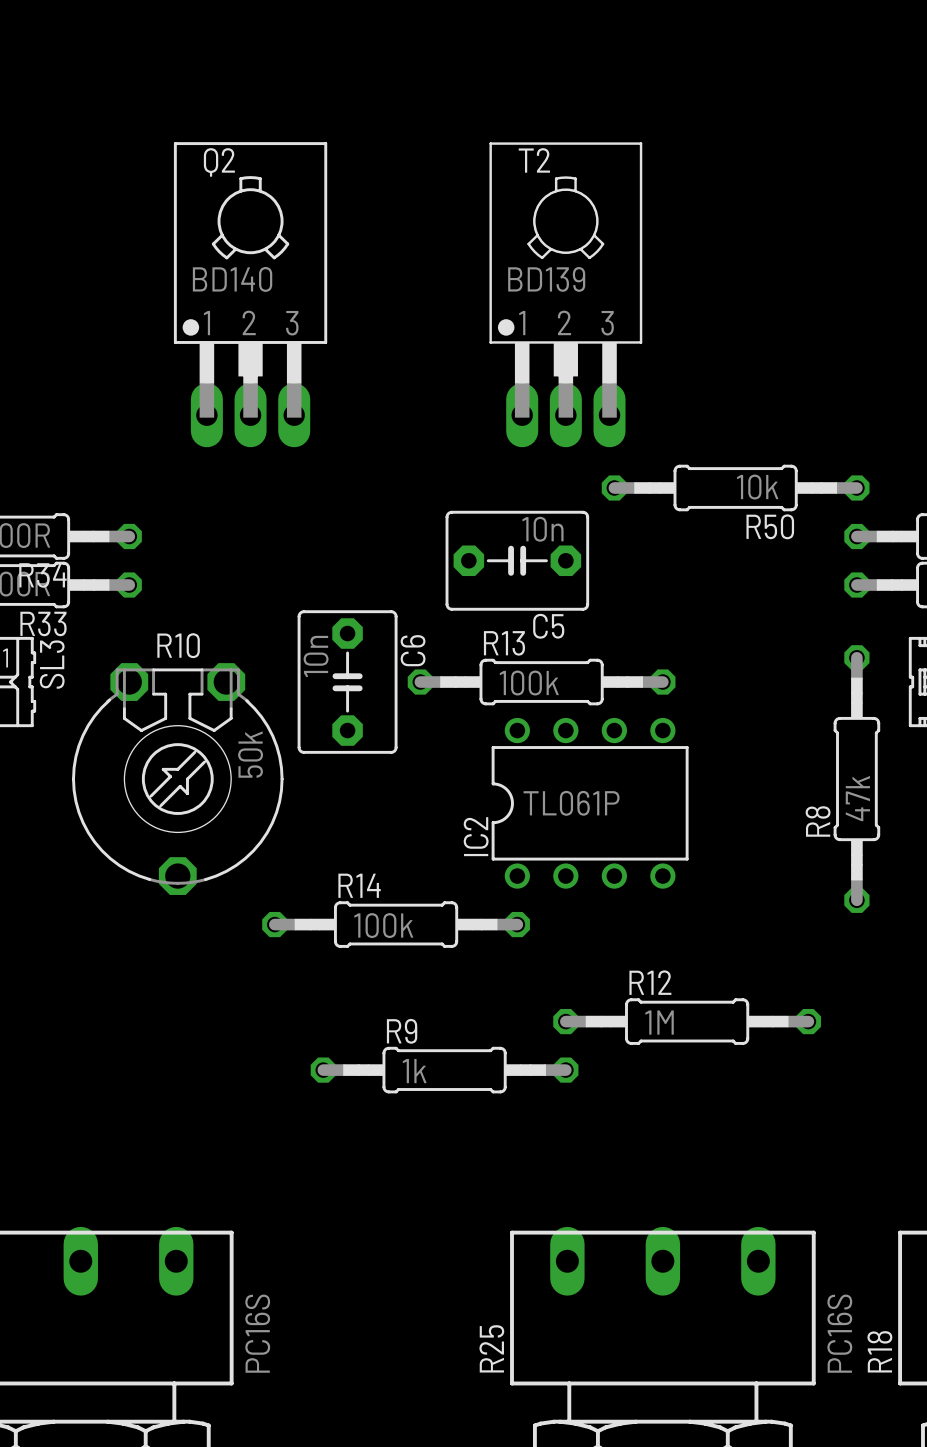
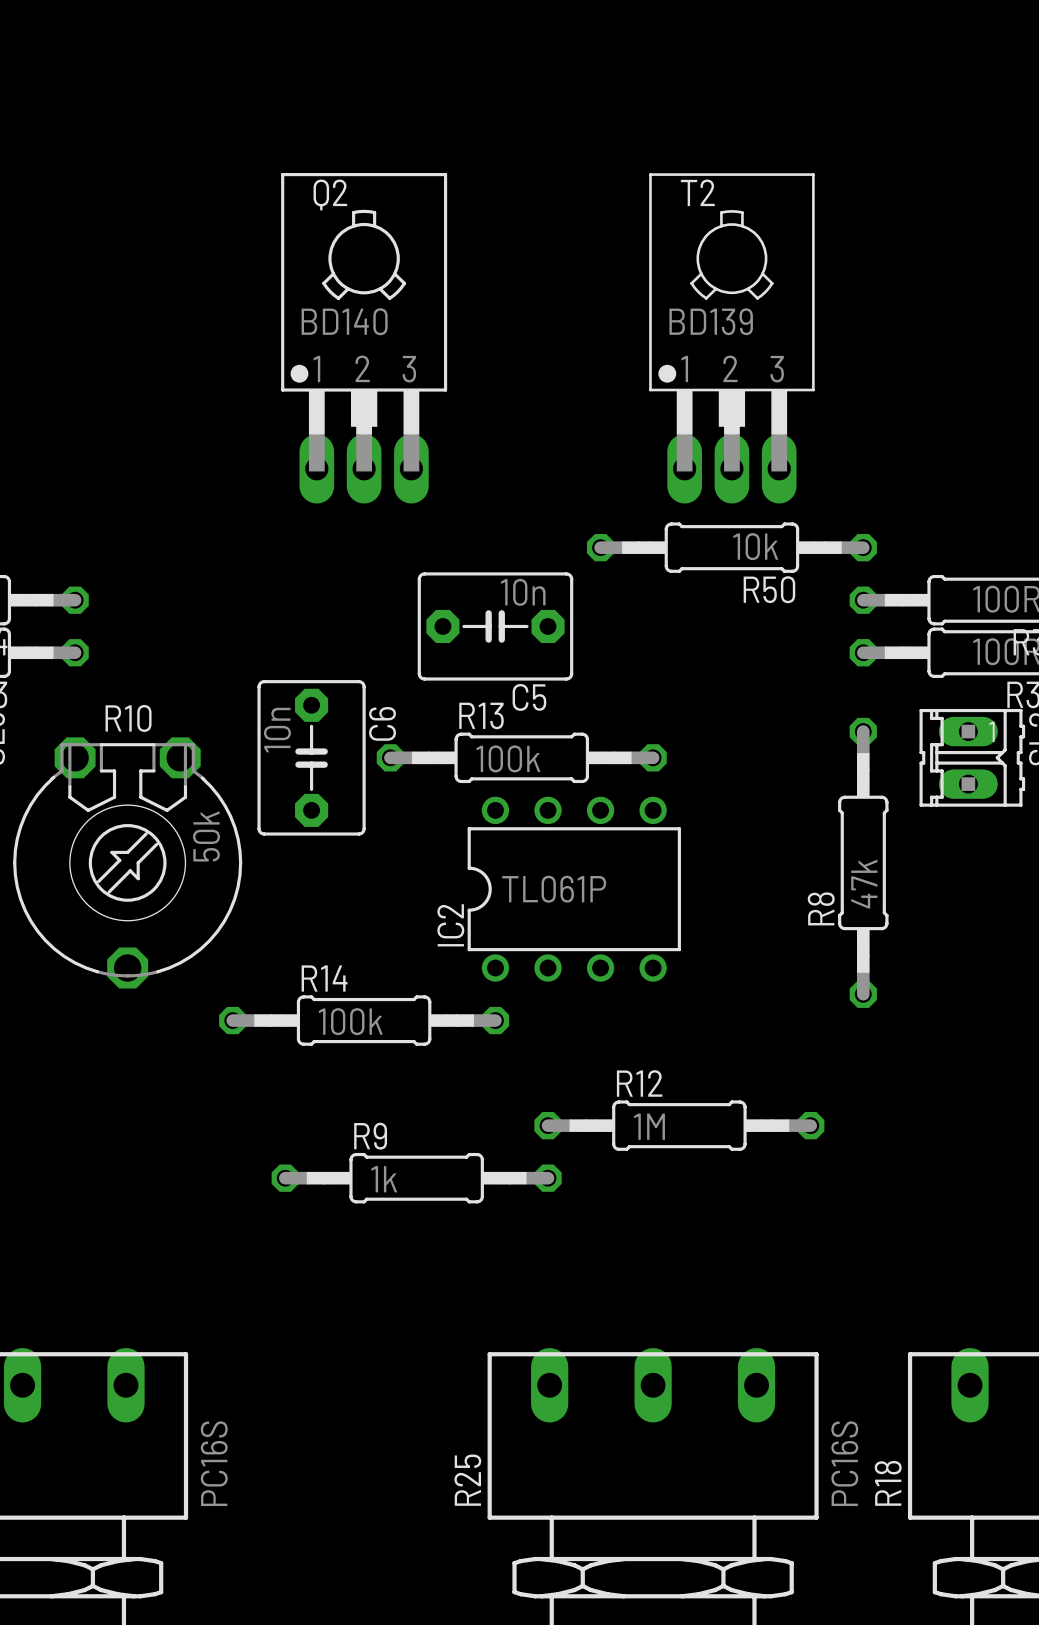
Q2 position: (250, 294) -> (364, 338)
T2 position: (565, 294) -> (731, 338)

